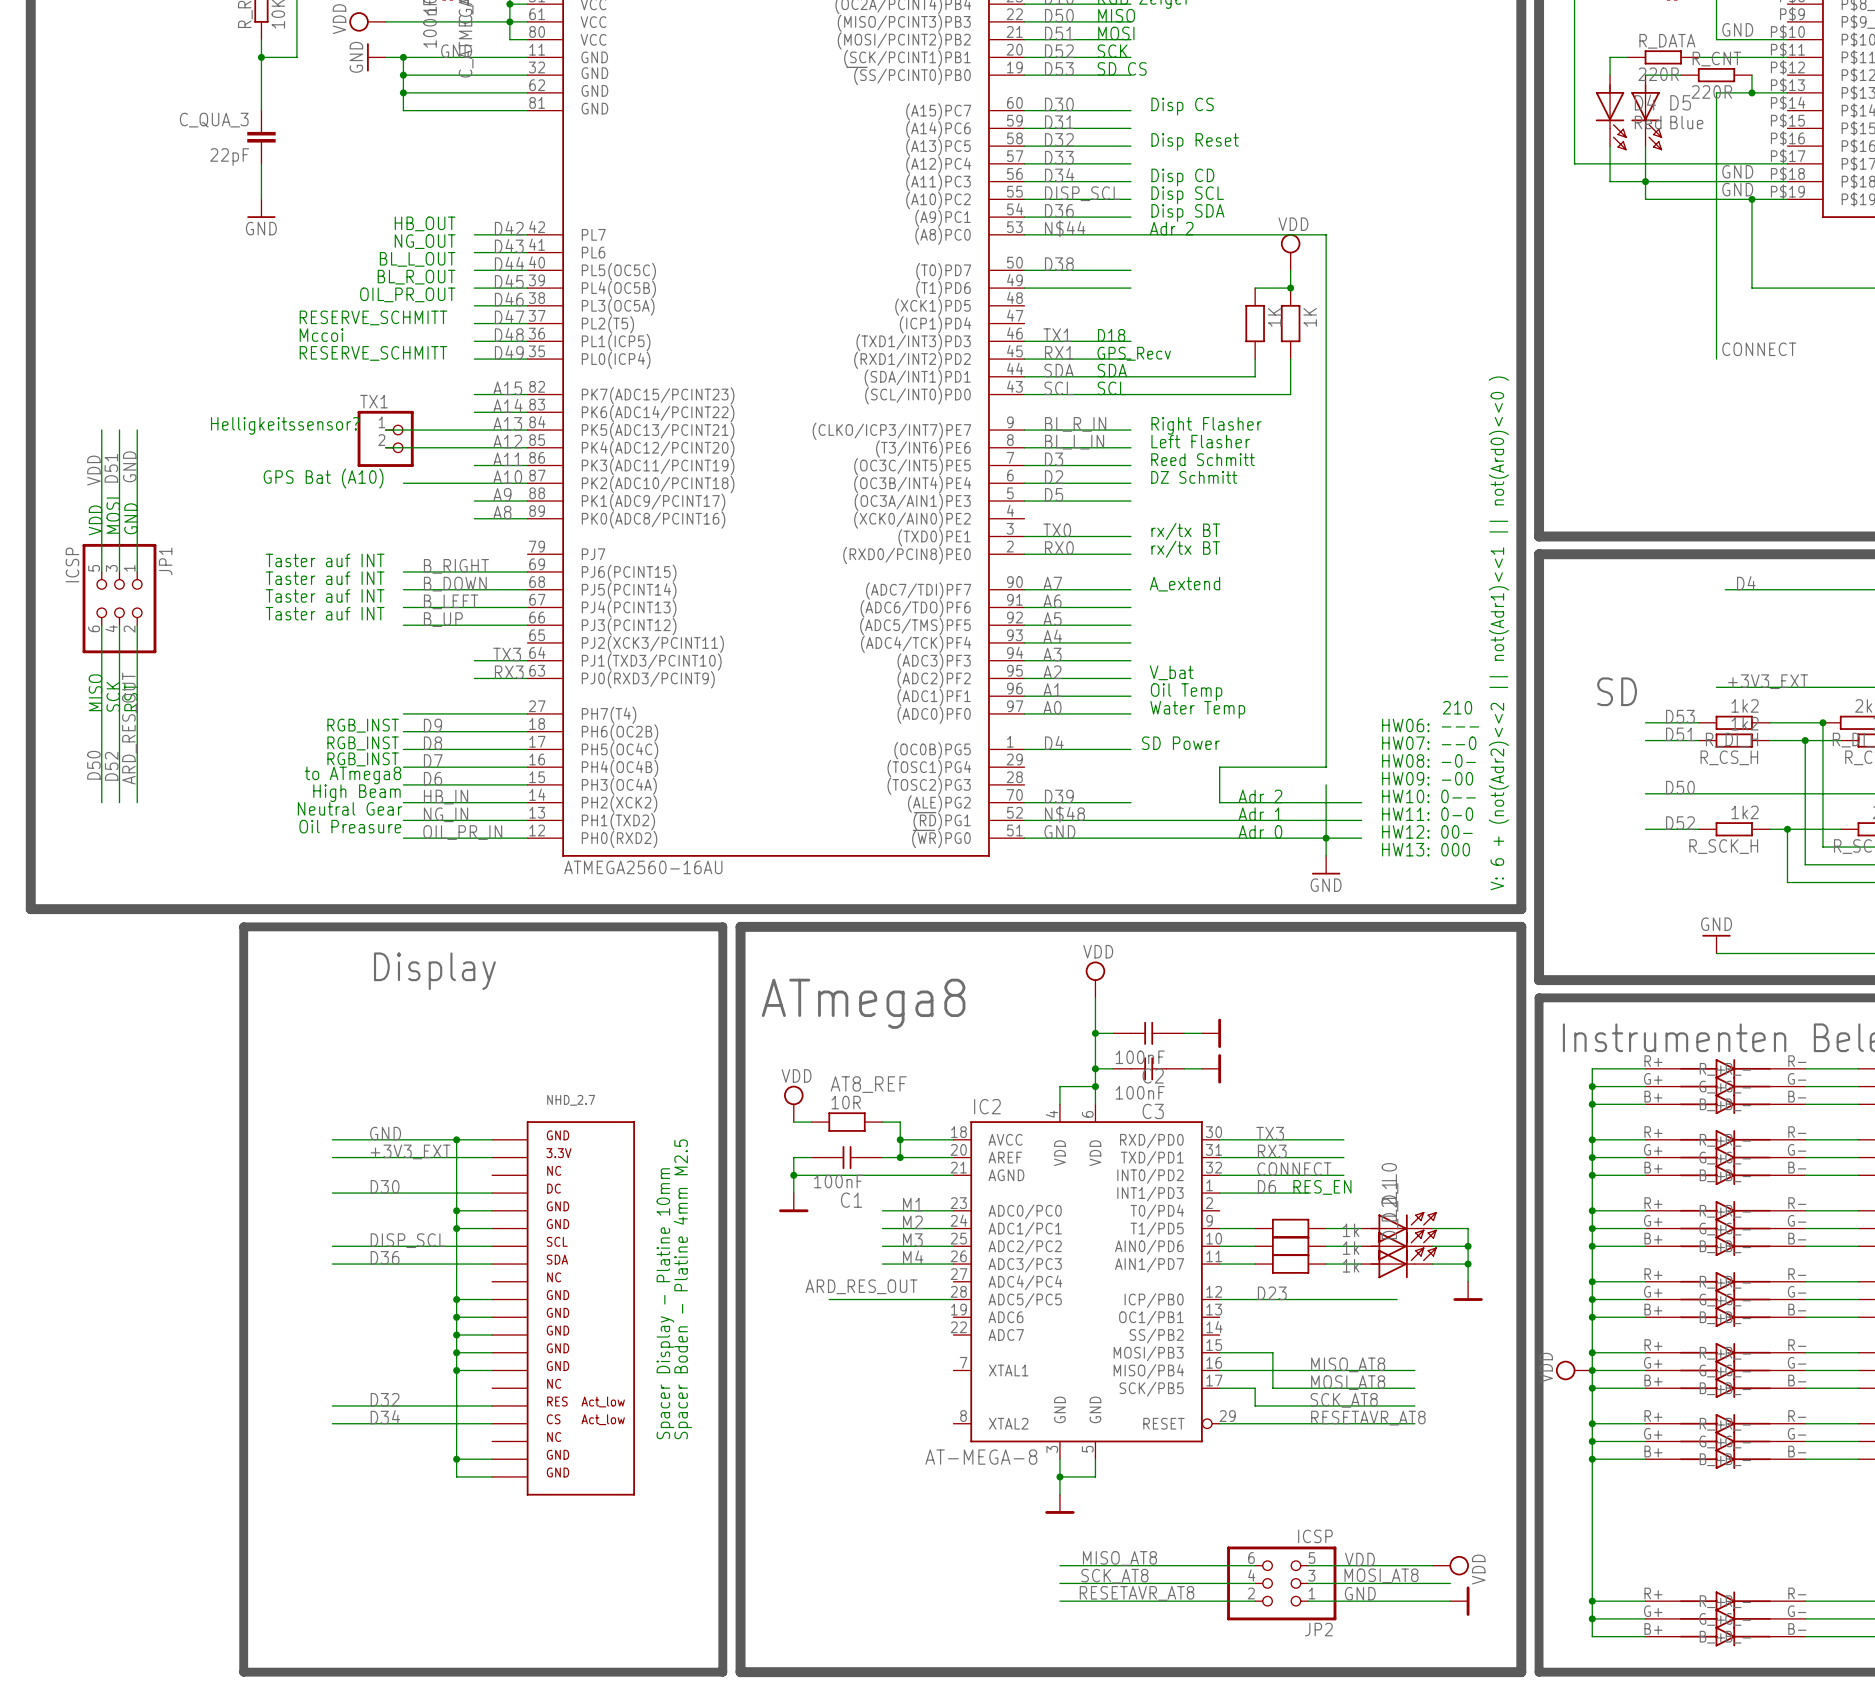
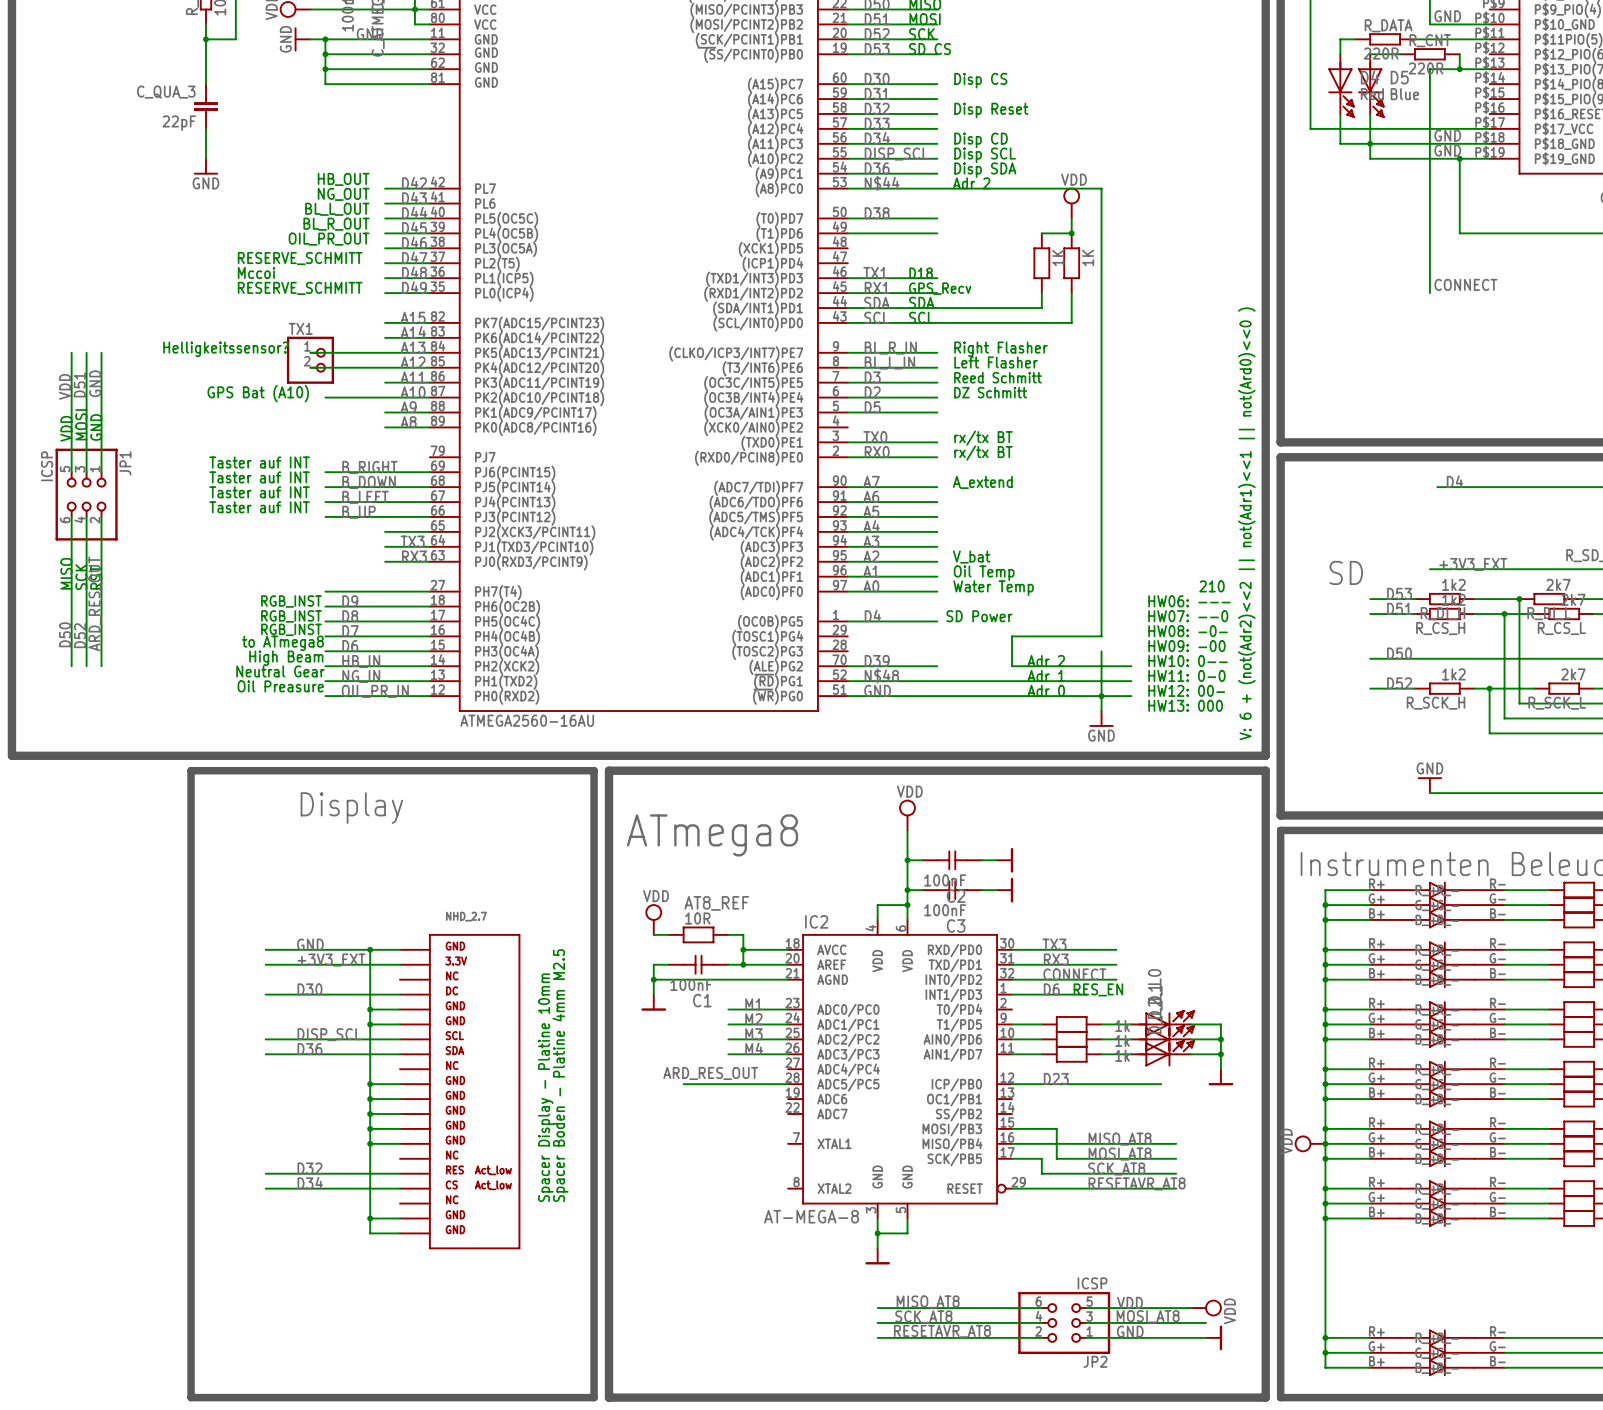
wire: none -> (385, 531) (429, 531)

